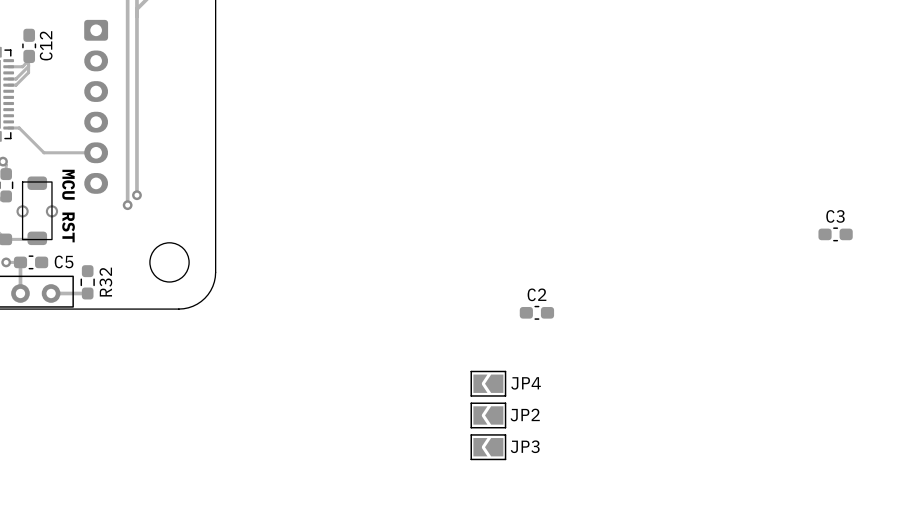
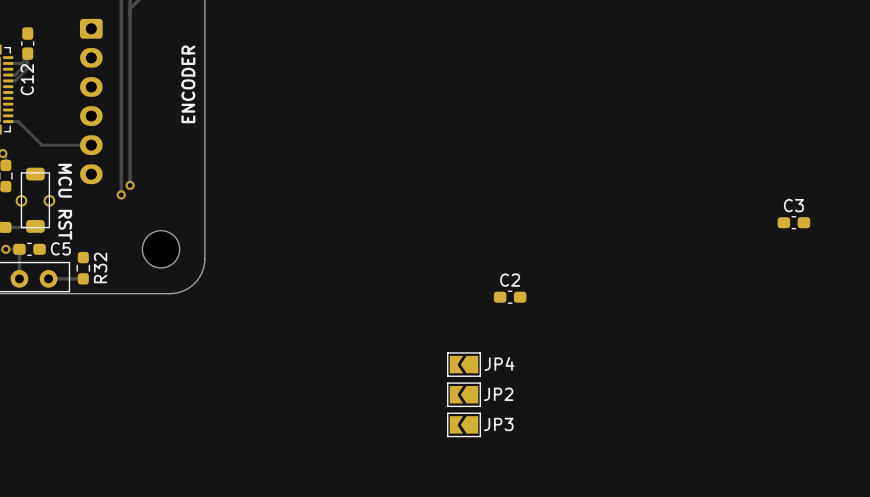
C12 name position: C12 (46, 45) -> C12 (27, 79)
text: none -> ENCODER (188, 84)

